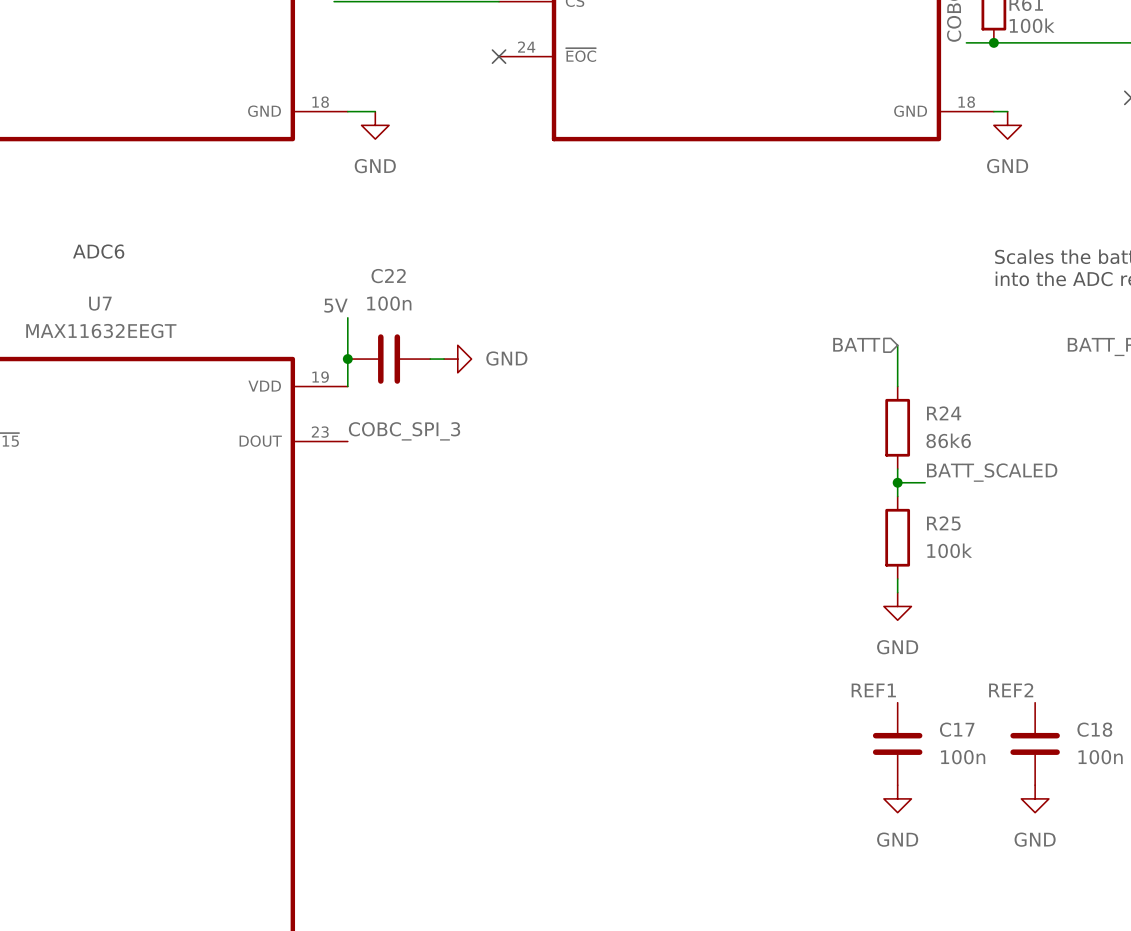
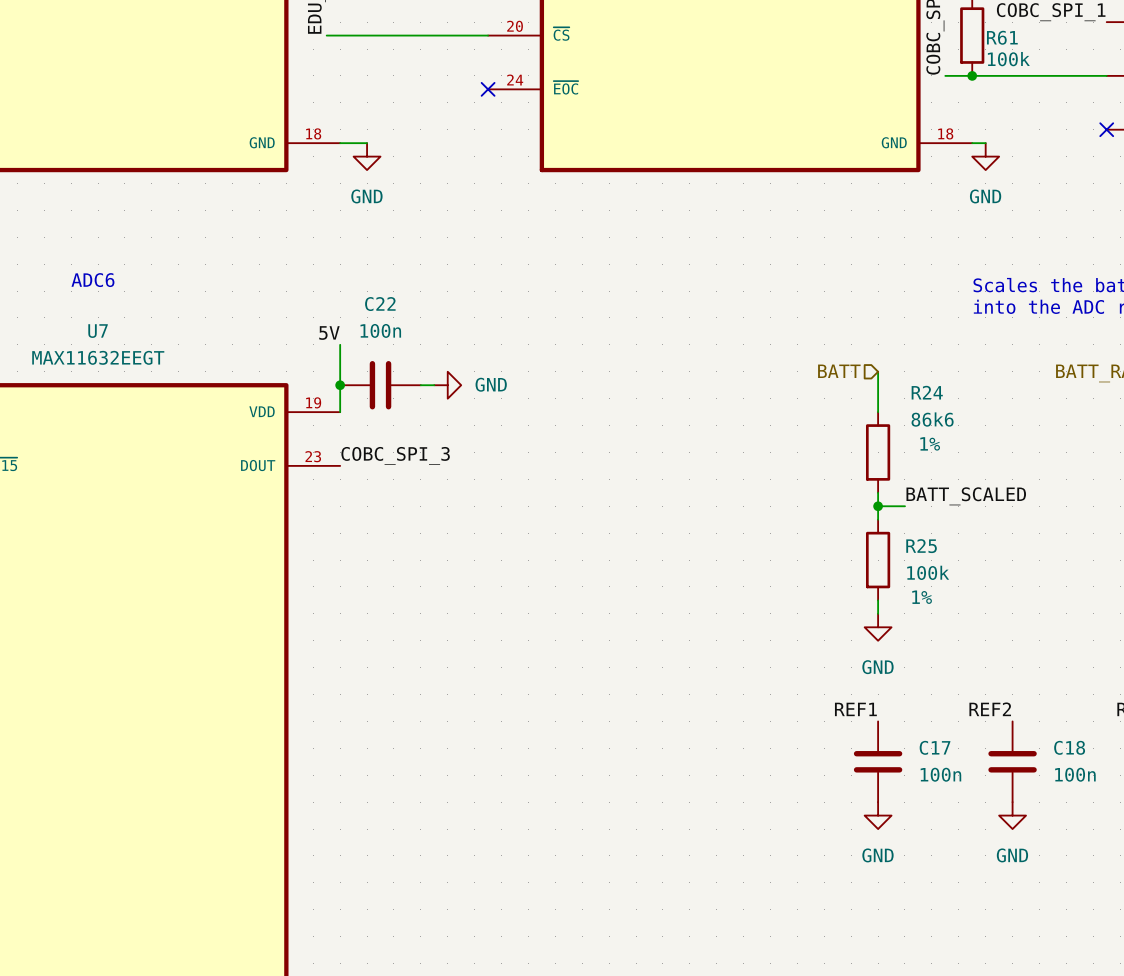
R24 name position: R24 (944, 413) -> R24 (927, 392)
R24 text: none -> 1% (930, 443)
R24 value position: 86k6 (948, 440) -> 86k6 (932, 419)
R25 text: none -> 1% (922, 597)

